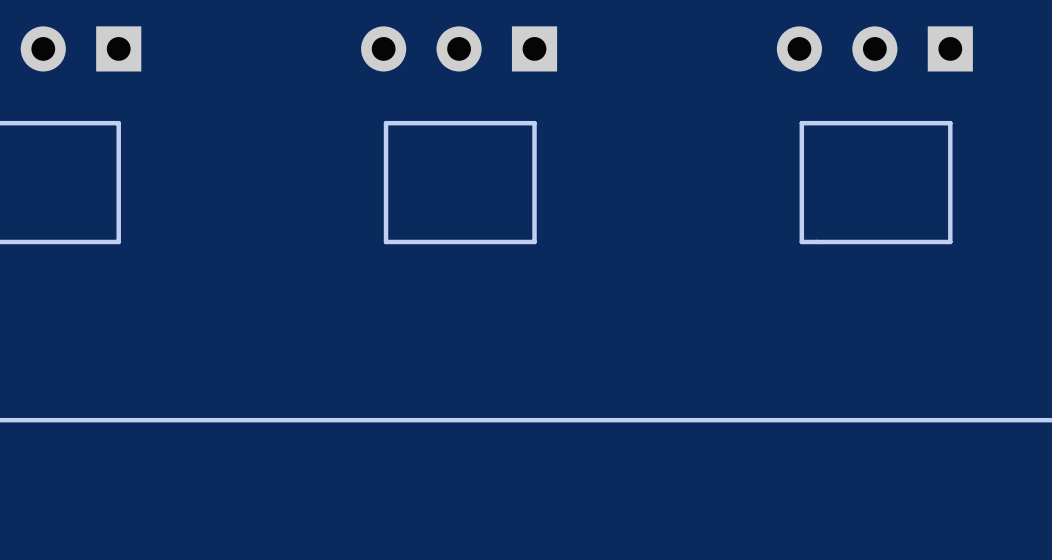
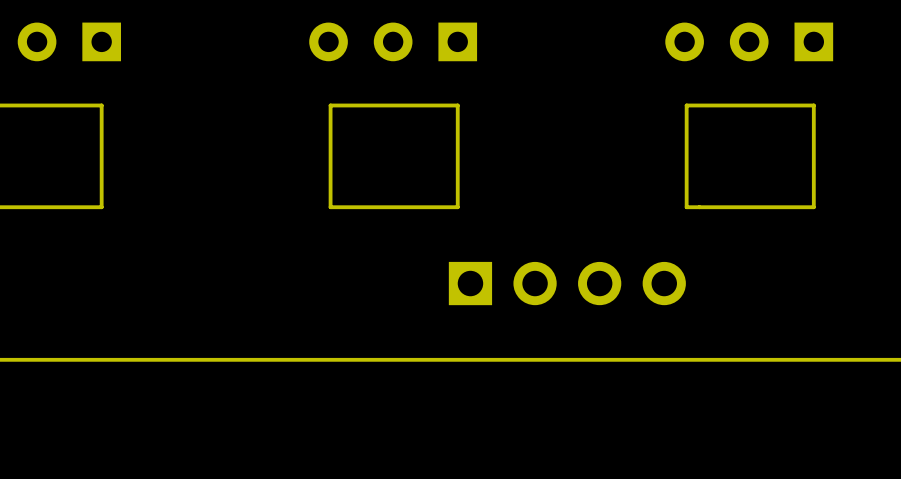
part: none -> (567, 283)

